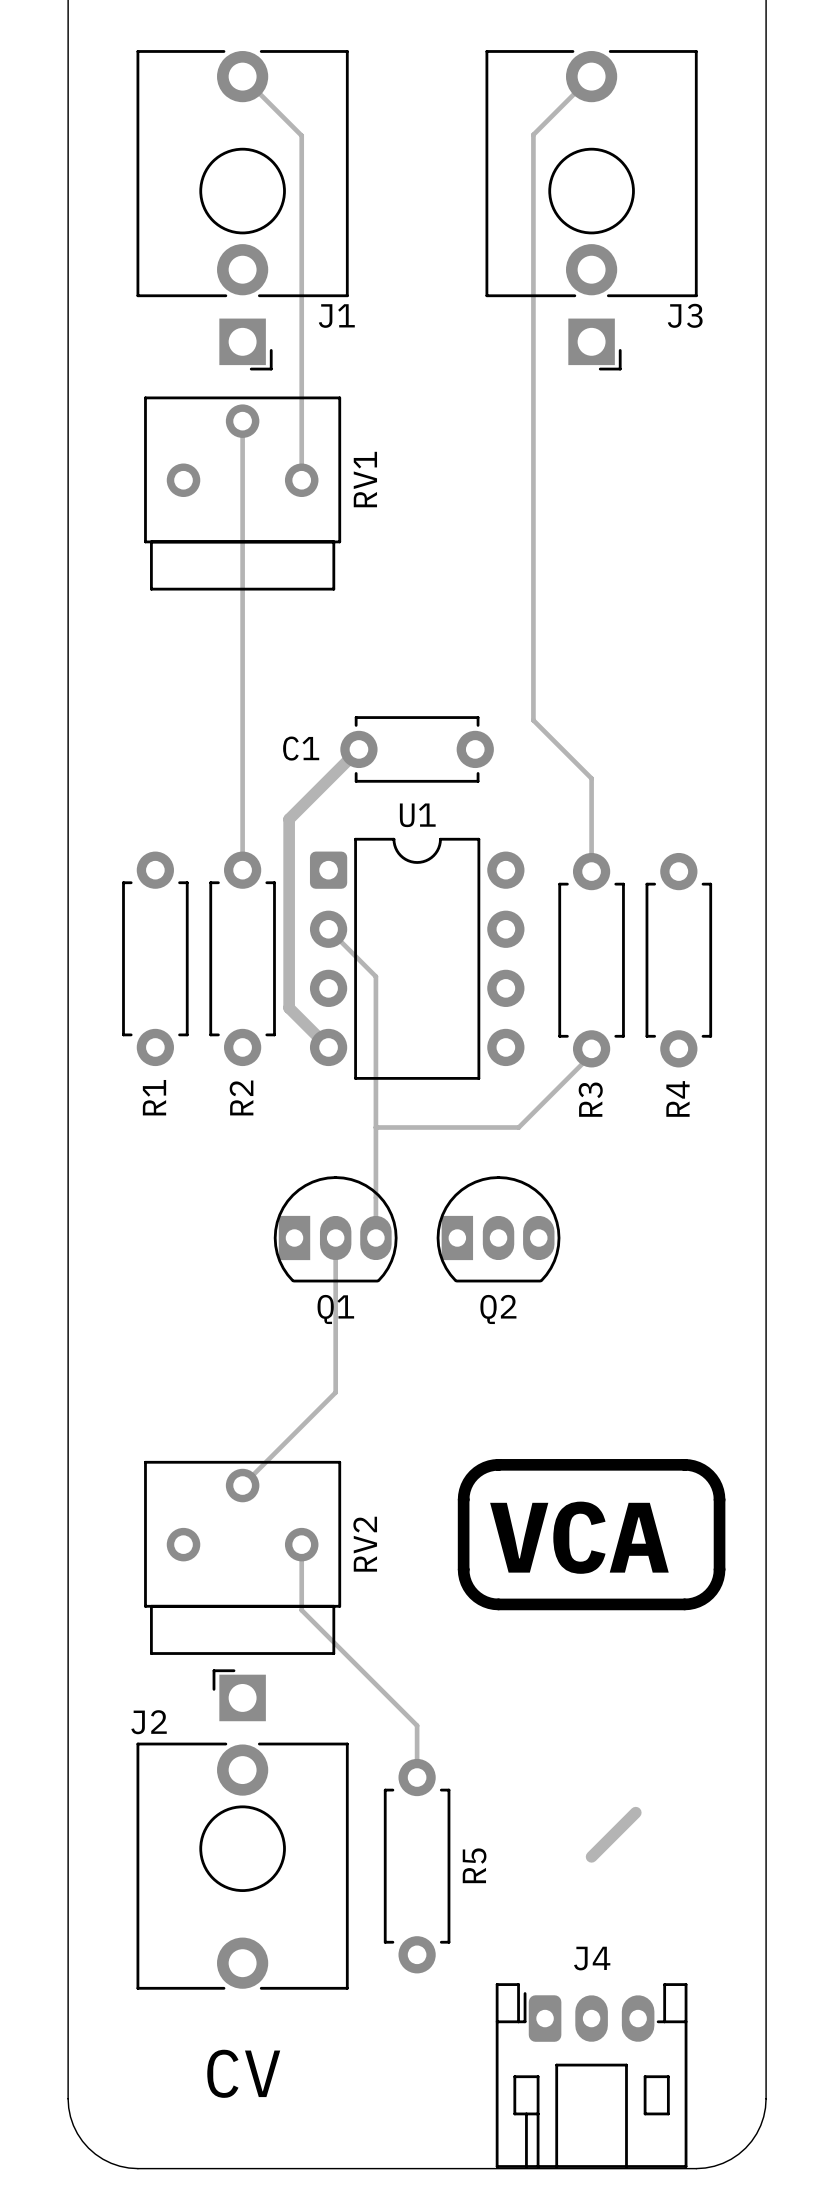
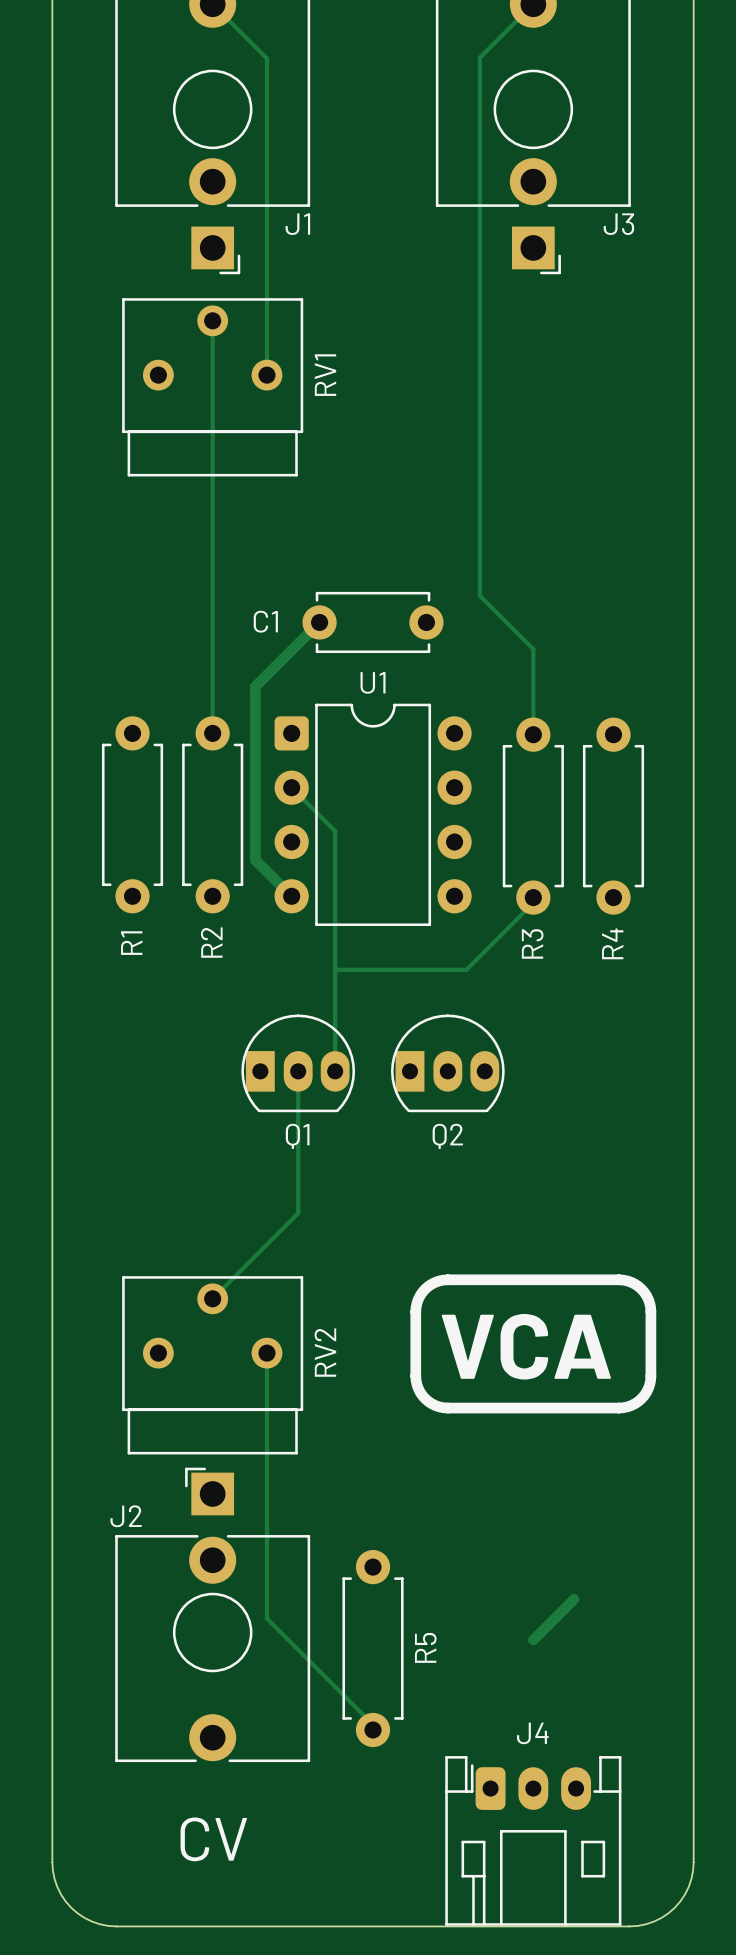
track: (301, 1610) (417, 1725) (417, 1777) -> (266, 1413) (266, 1618) (373, 1724)

